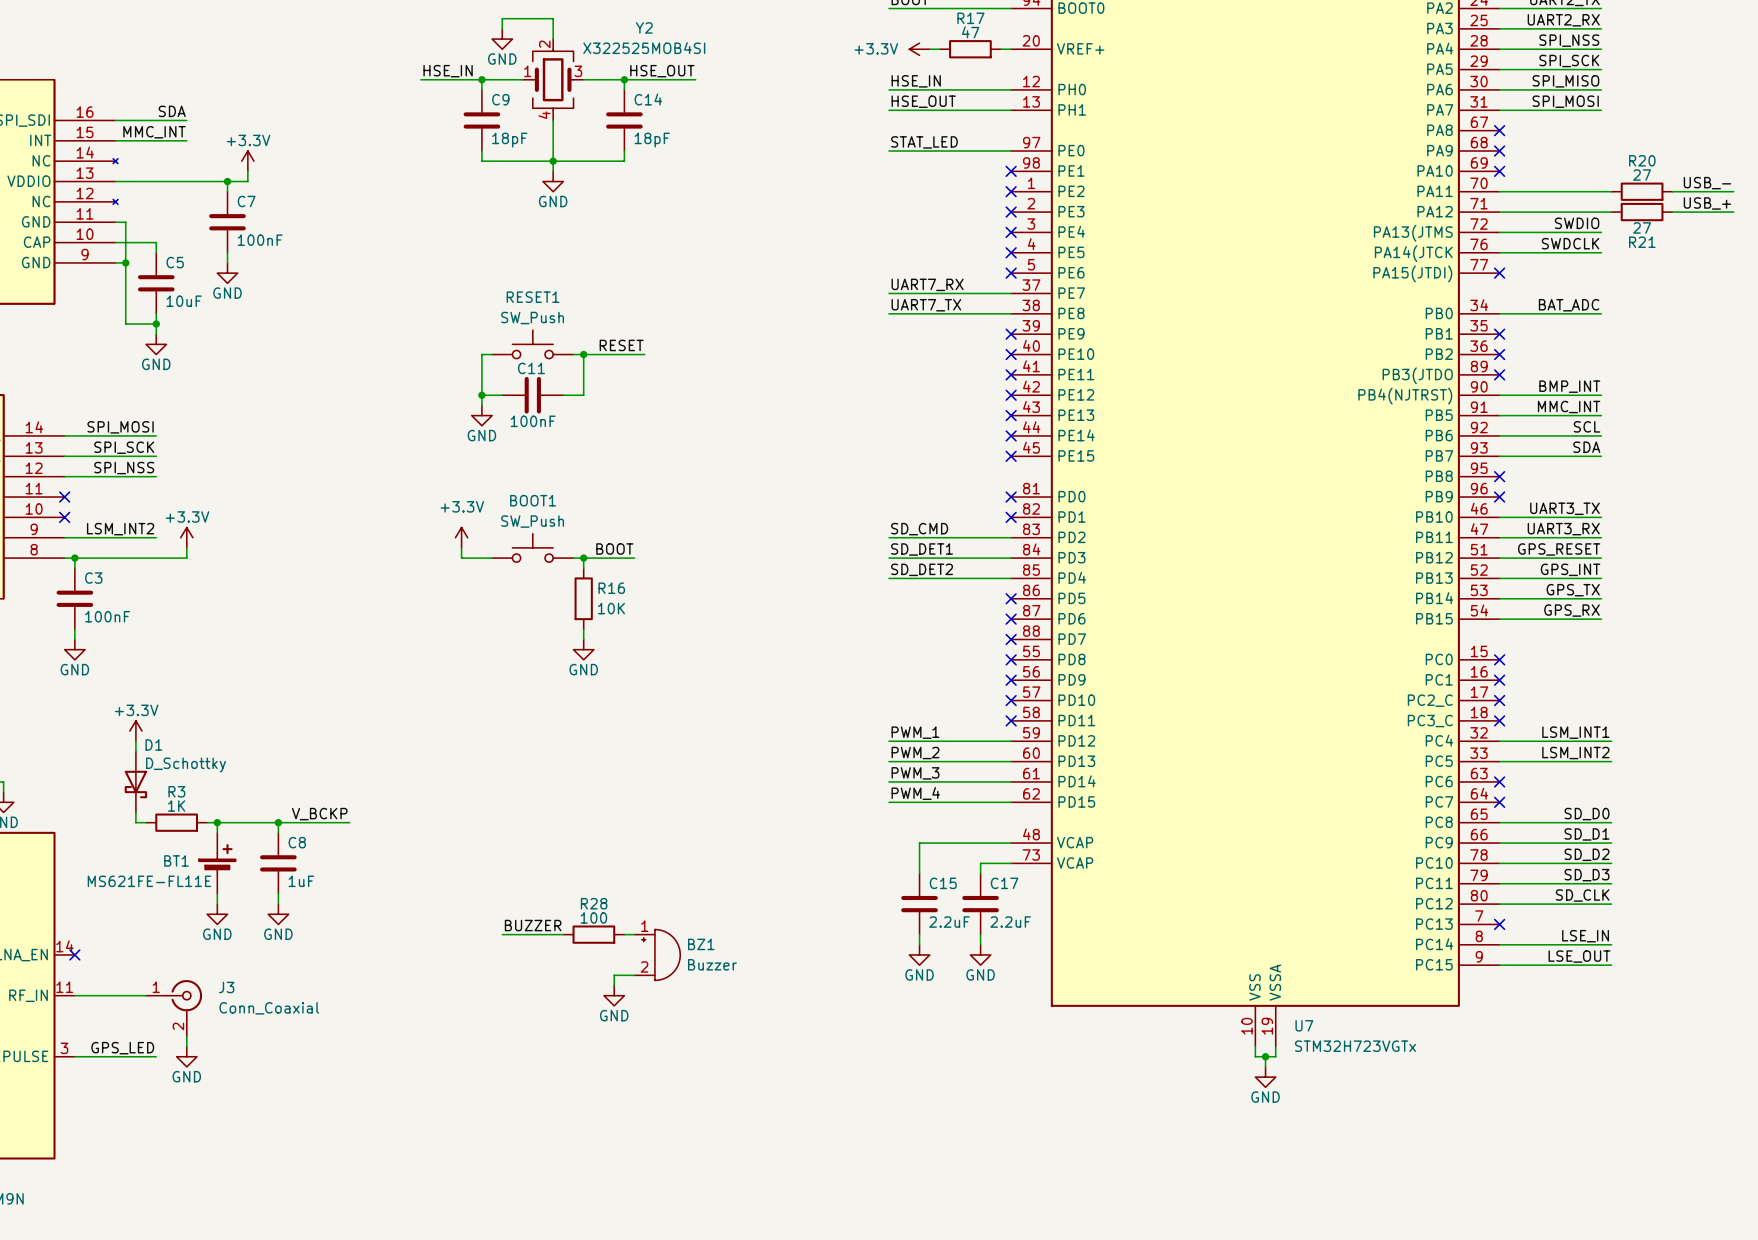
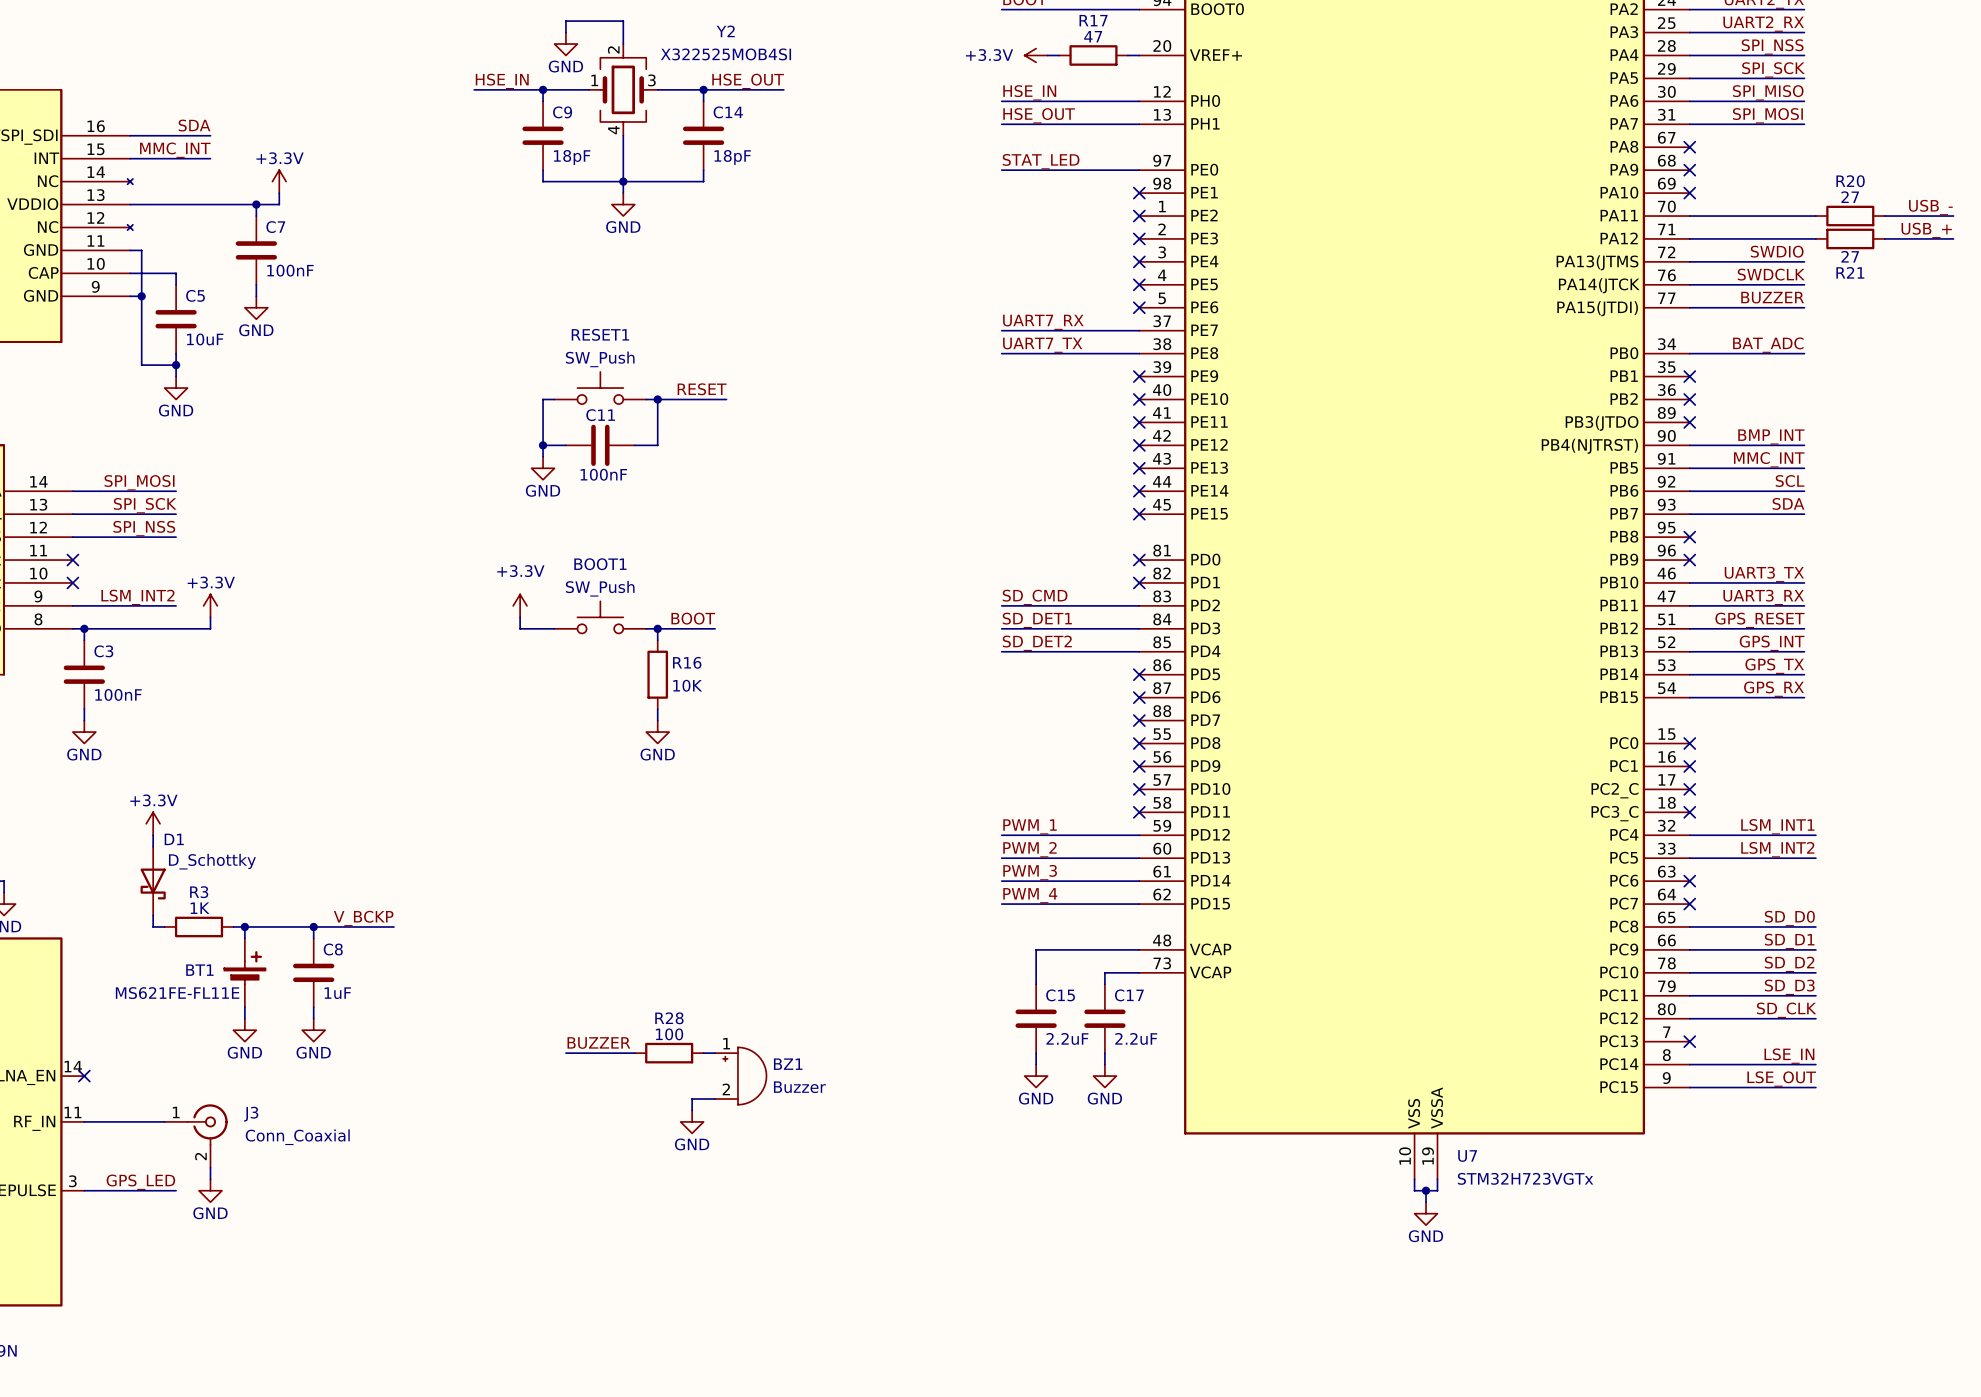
label: none -> BUZZER (1772, 297)
wire: none -> (1689, 307) (1804, 307)
no-connect mark: (1499, 273) -> none

